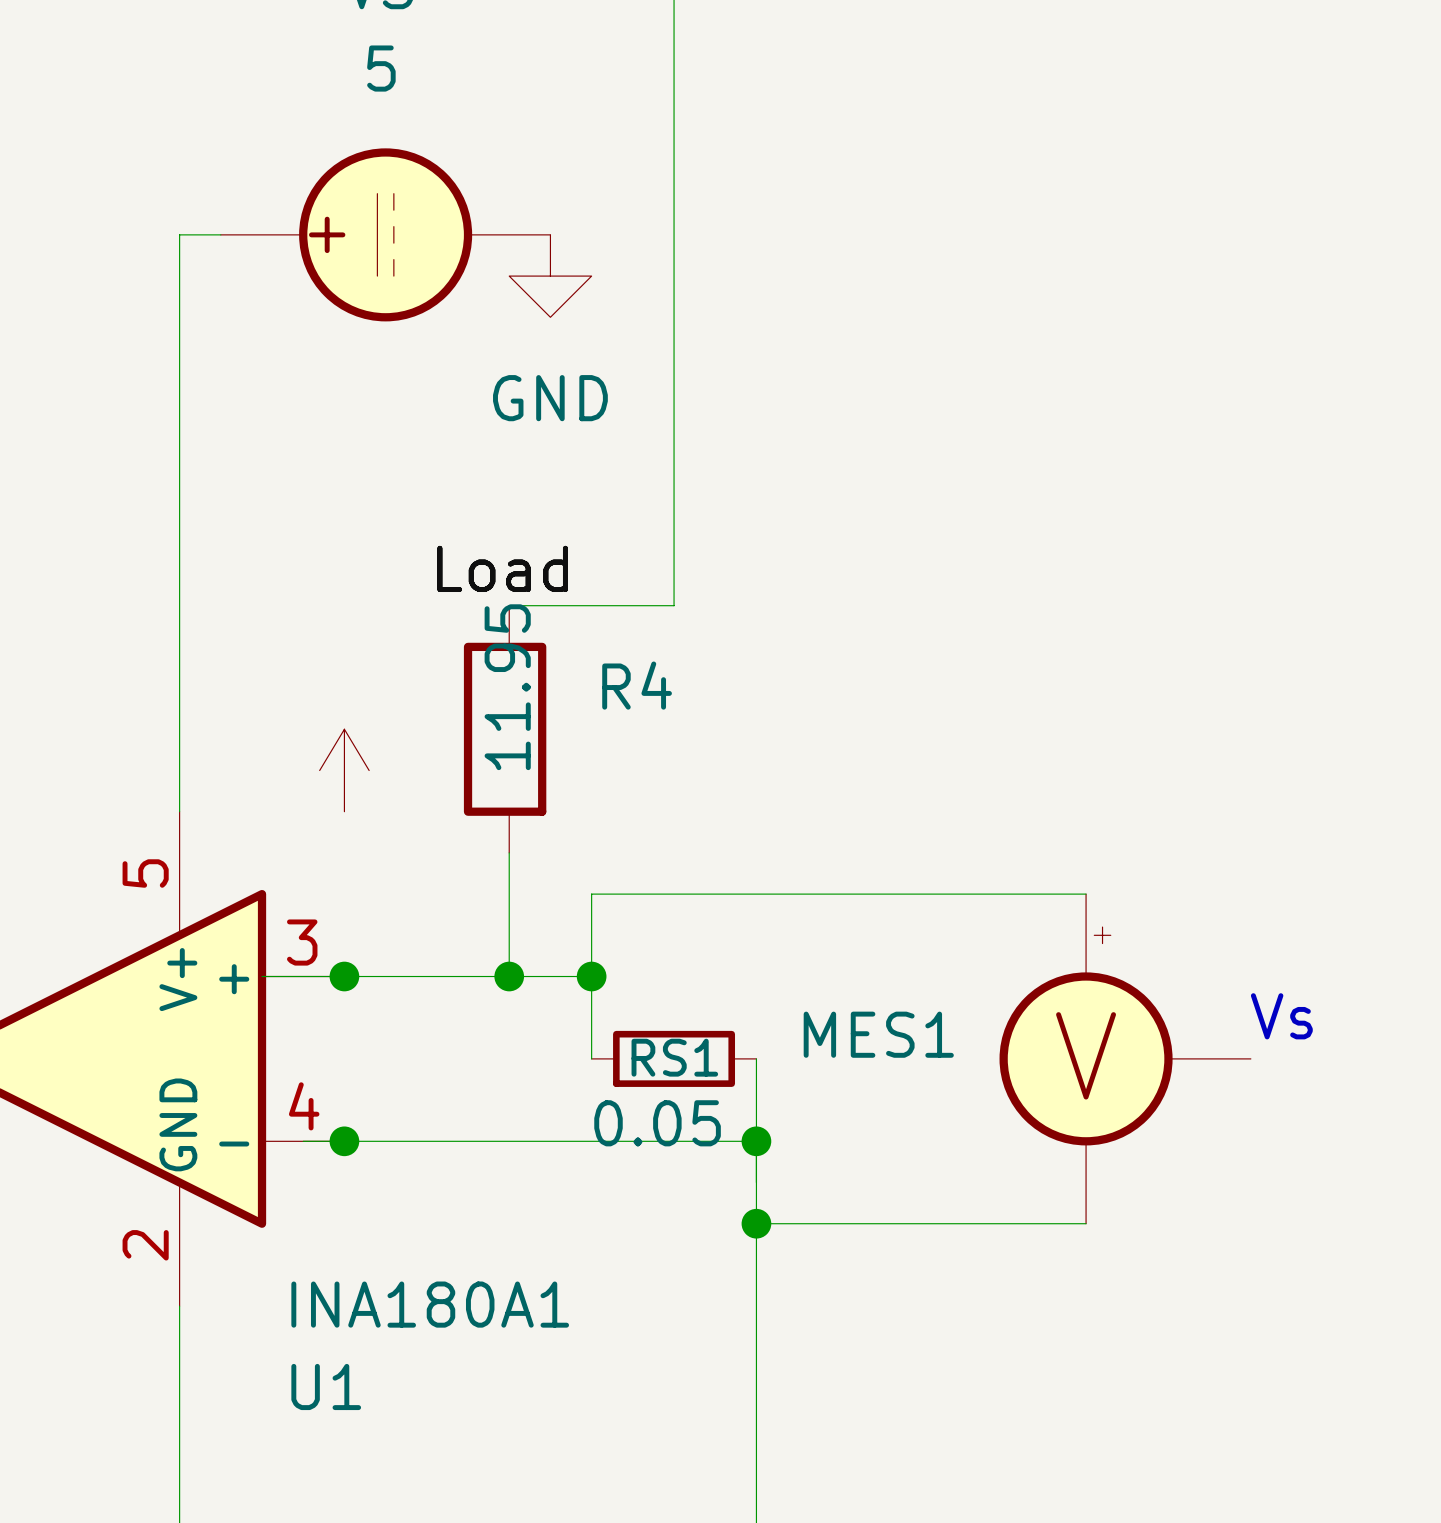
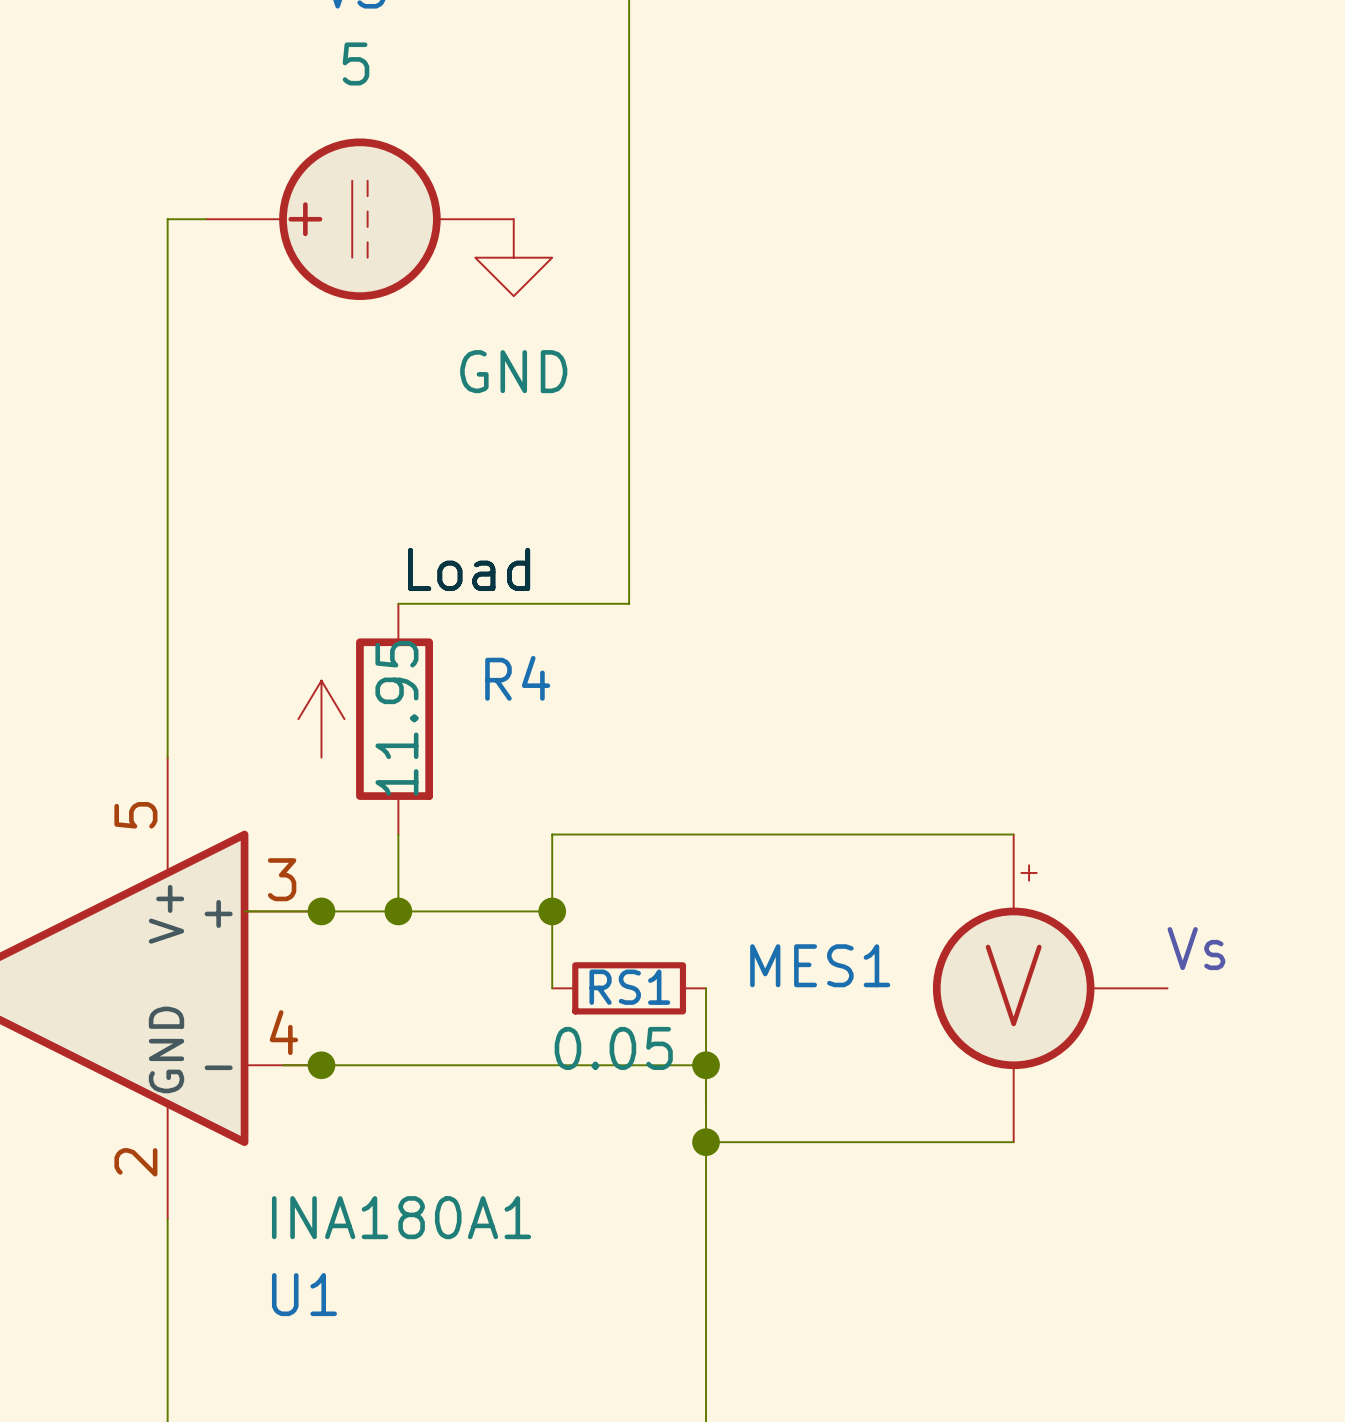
label position: Load (502, 568) -> Load (469, 569)
wire: (509, 605) (674, 605) -> (398, 603) (629, 603) (629, 565)
R4 value position: 11.95 (507, 687) -> 11.95 (396, 718)
R4 position: (505, 729) -> (394, 719)
wire: (509, 852) (509, 976) -> none
wire: none -> (398, 834) (398, 911)
junction position: (509, 976) -> (398, 911)

